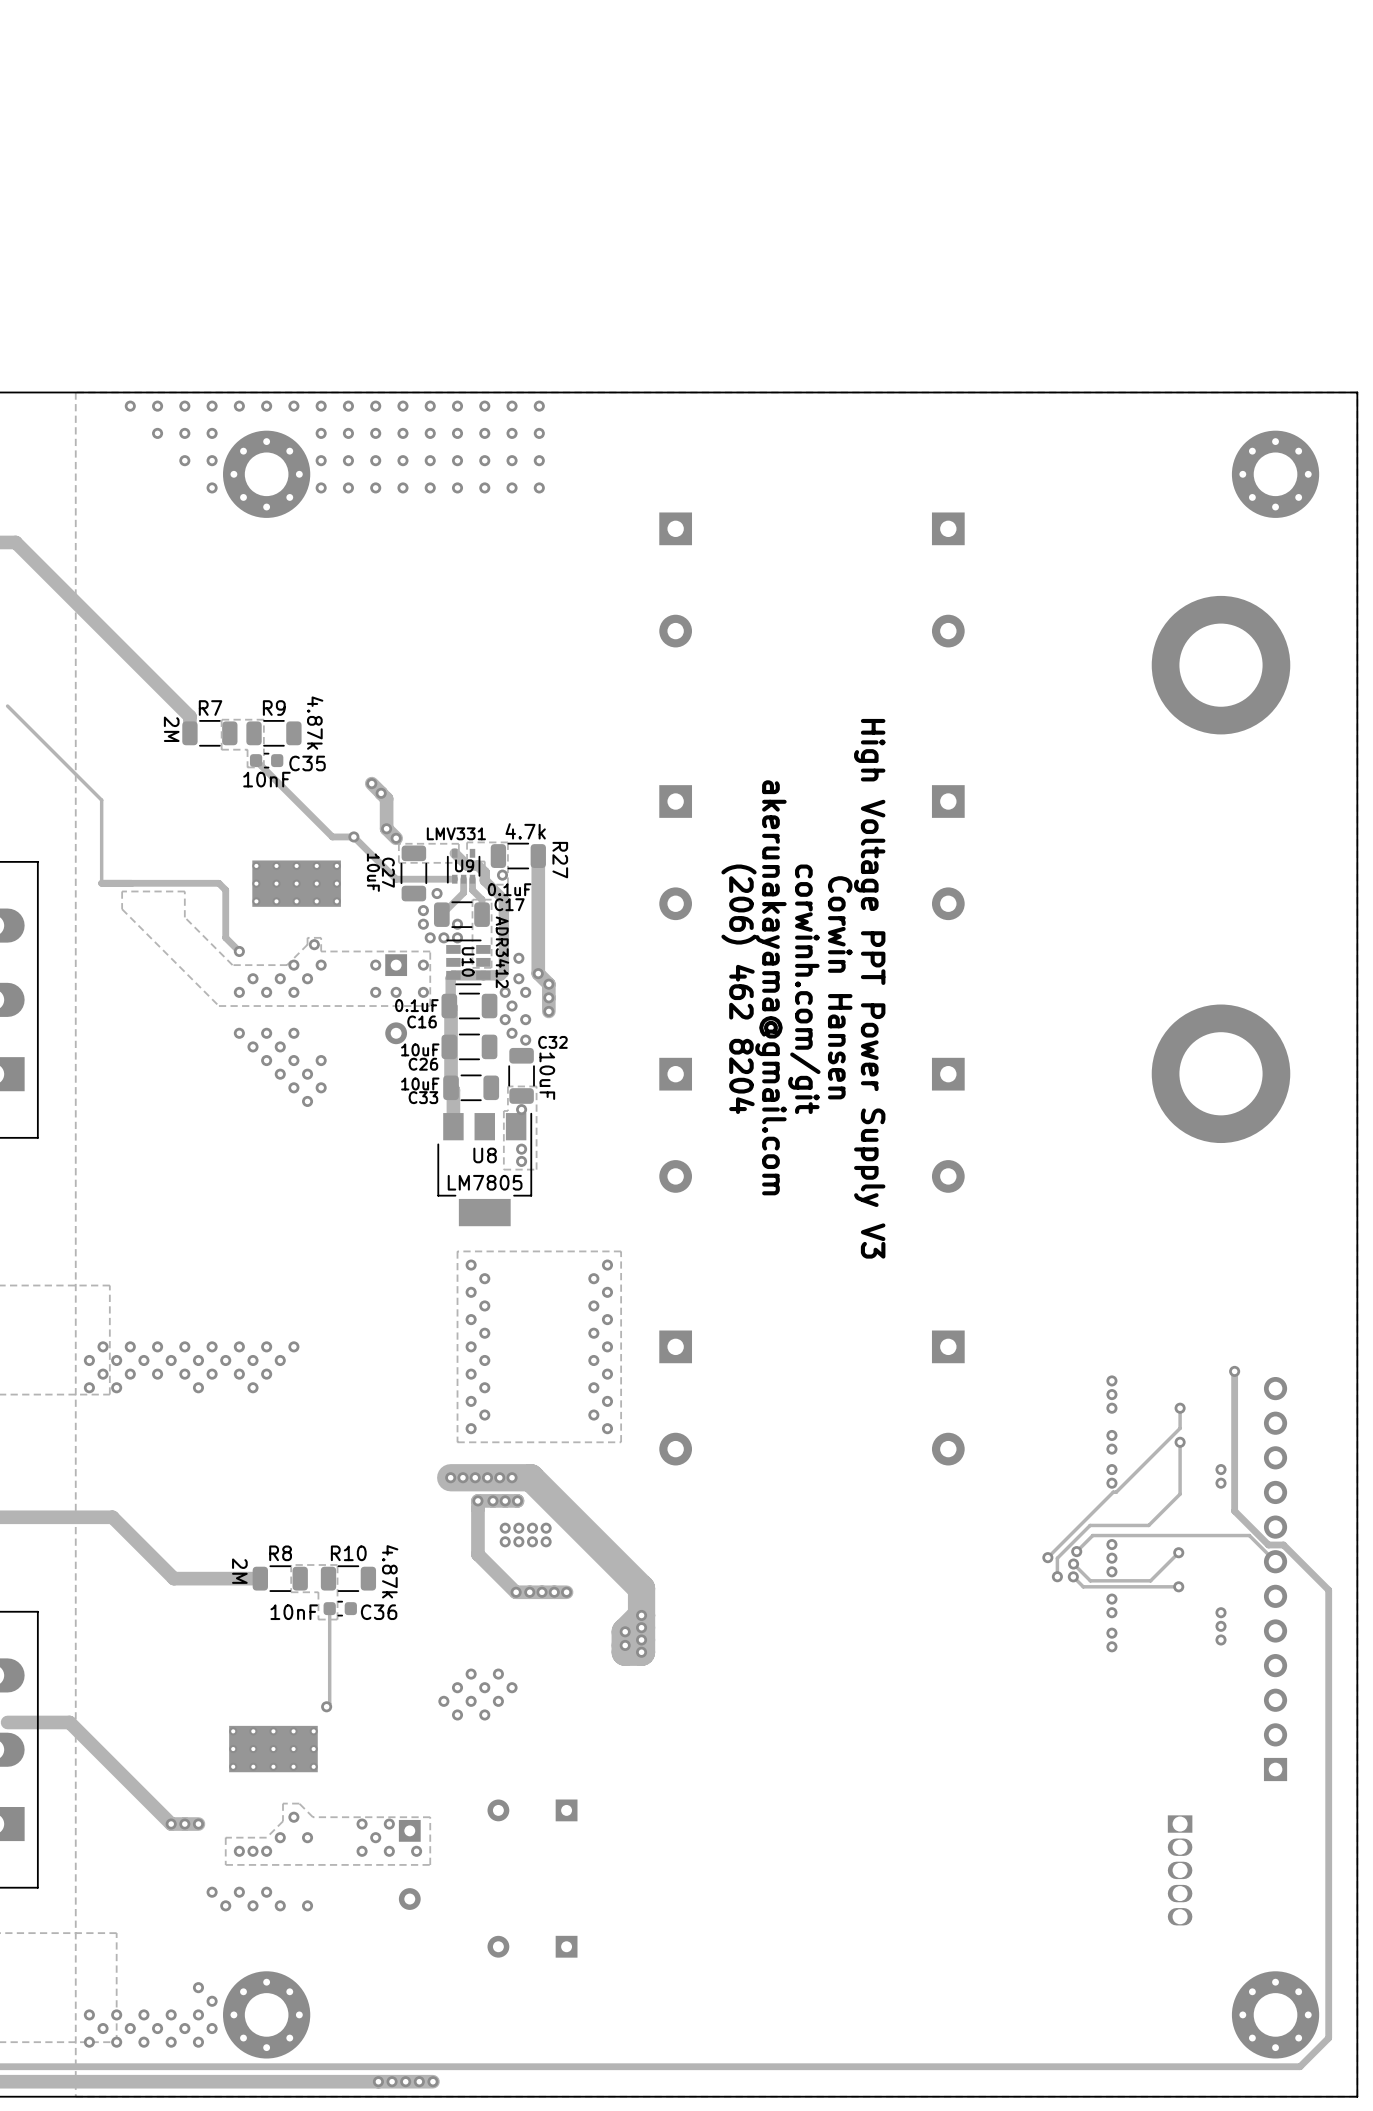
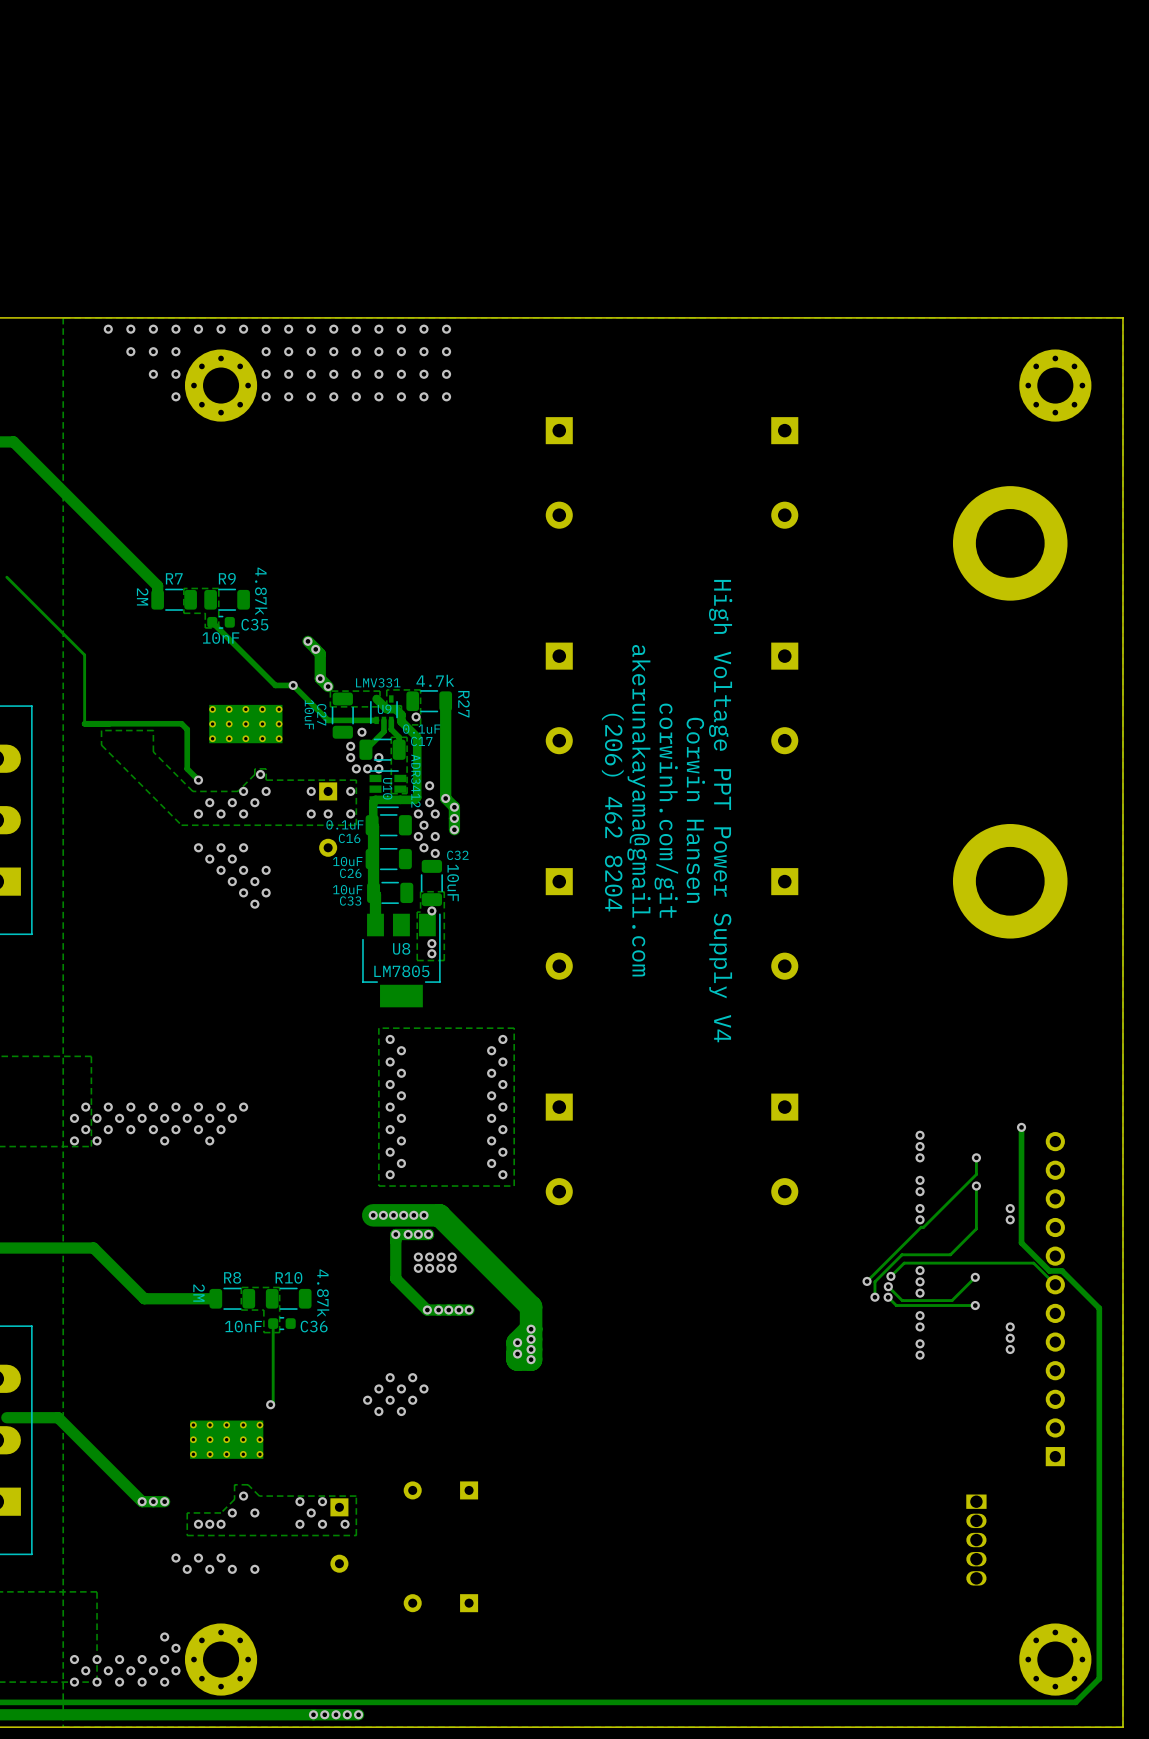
text: High Voltage PPT Power Supply V3 (869, 988) -> High Voltage PPT Power Supply V4 (720, 811)

